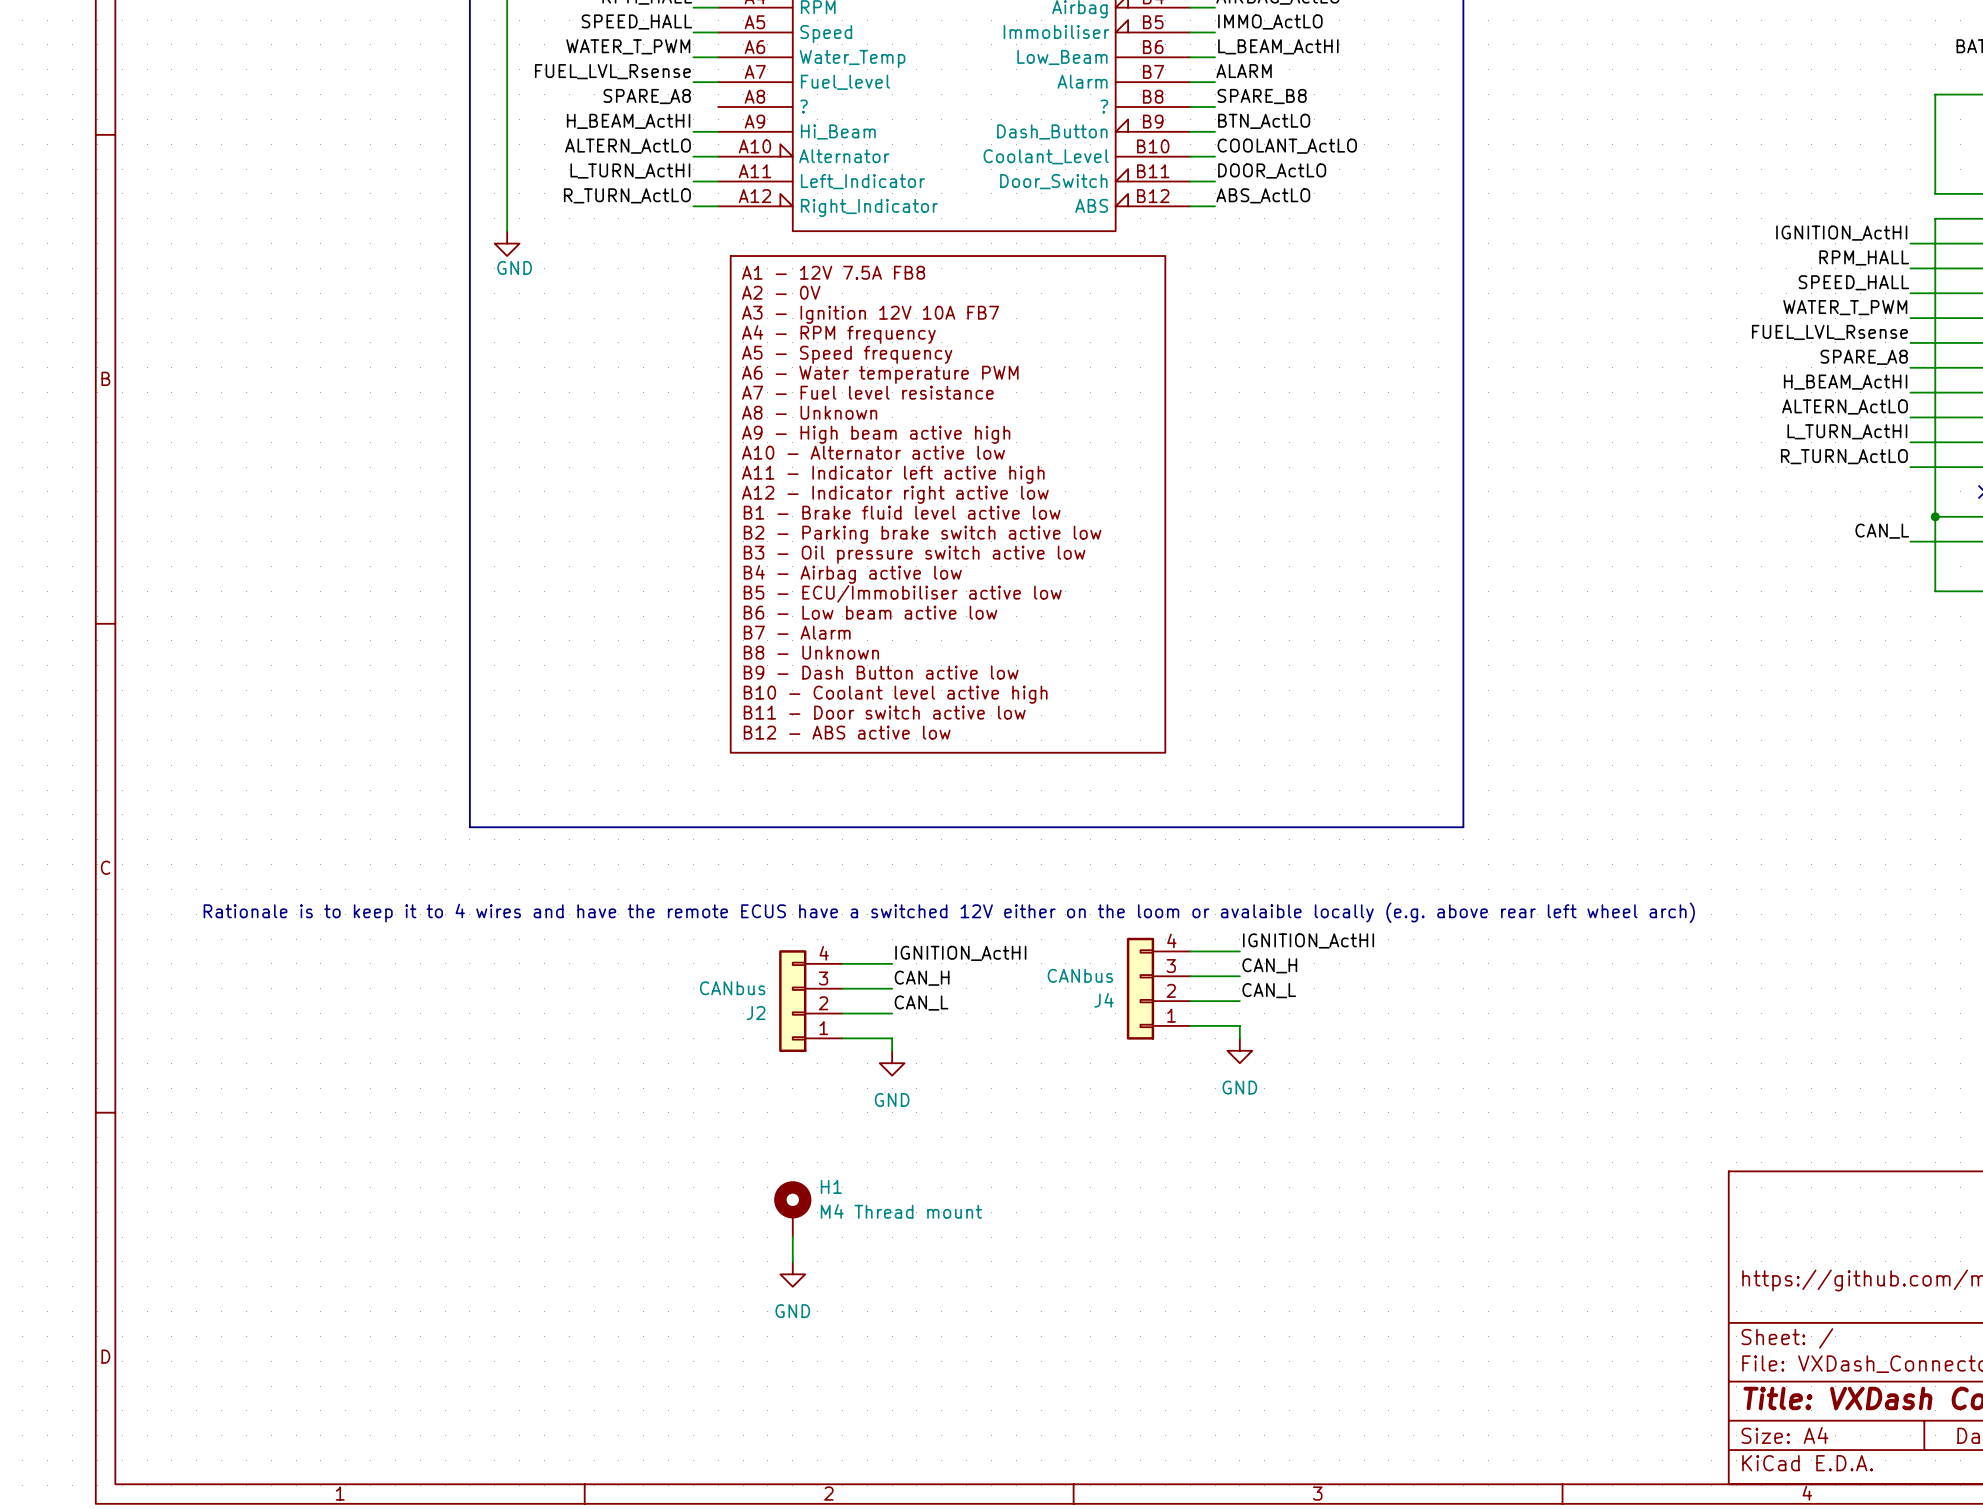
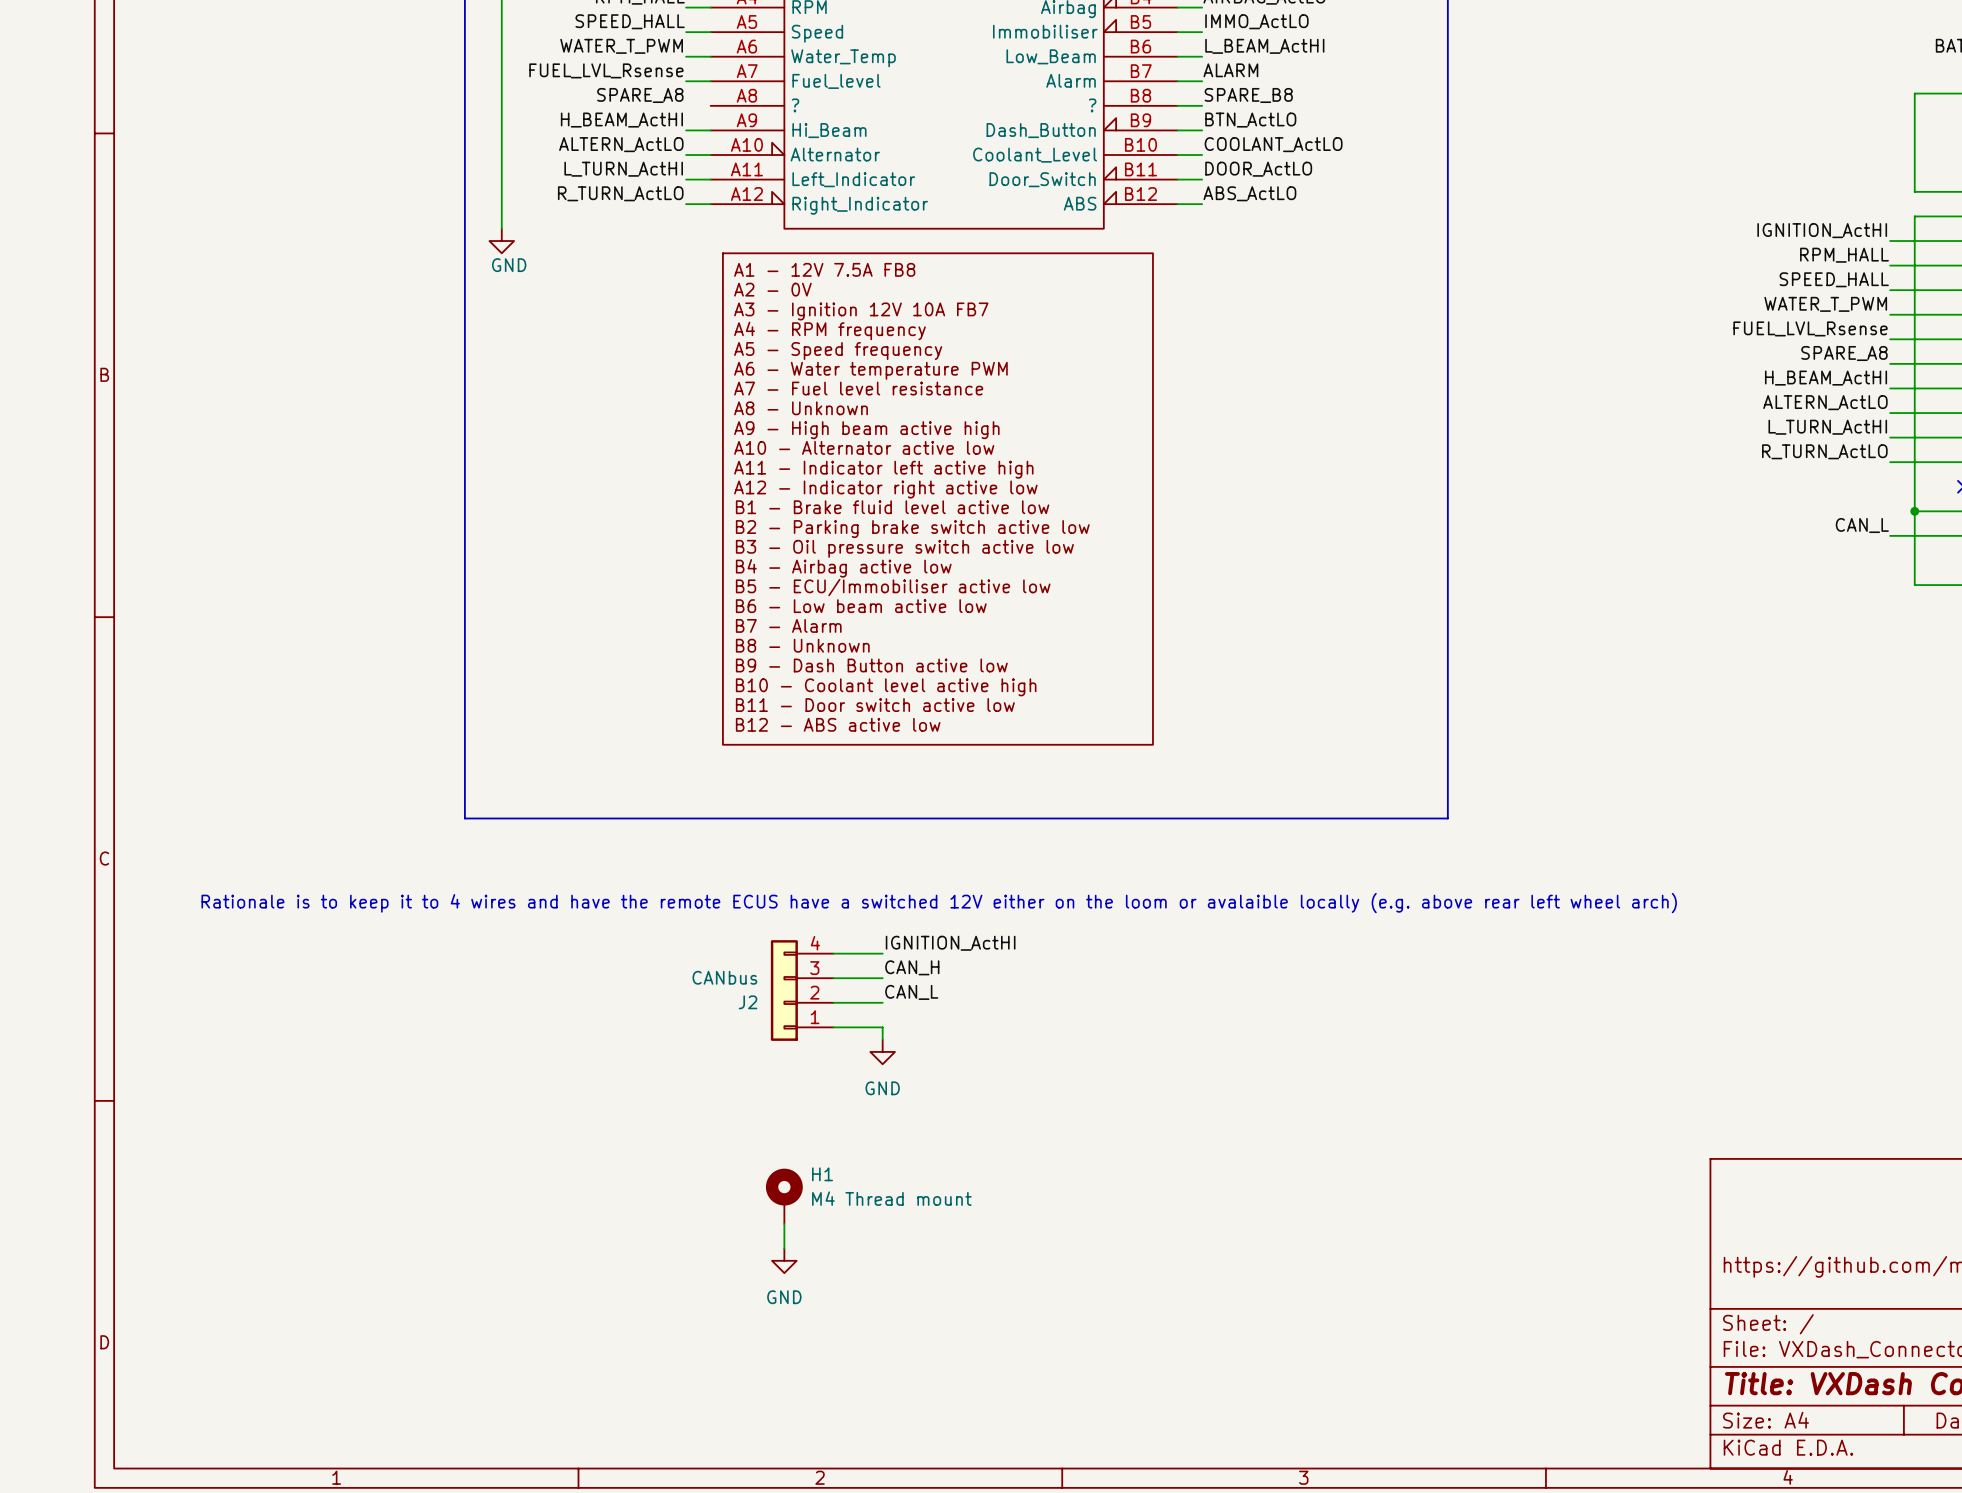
label: IGNITION_ActHI (1308, 940) -> none
wire: (1190, 951) (1239, 951) -> none
label: CAN_H (1269, 965) -> none
wire: (1190, 976) (1239, 976) -> none
J4: CANbus (1158, 988) -> none
label: CAN_L (1269, 990) -> none
wire: (1190, 1001) (1239, 1001) -> none
wire: (1190, 1025) (1239, 1025) (1239, 1038) -> none
power symbol: GND (1239, 1050) -> none

